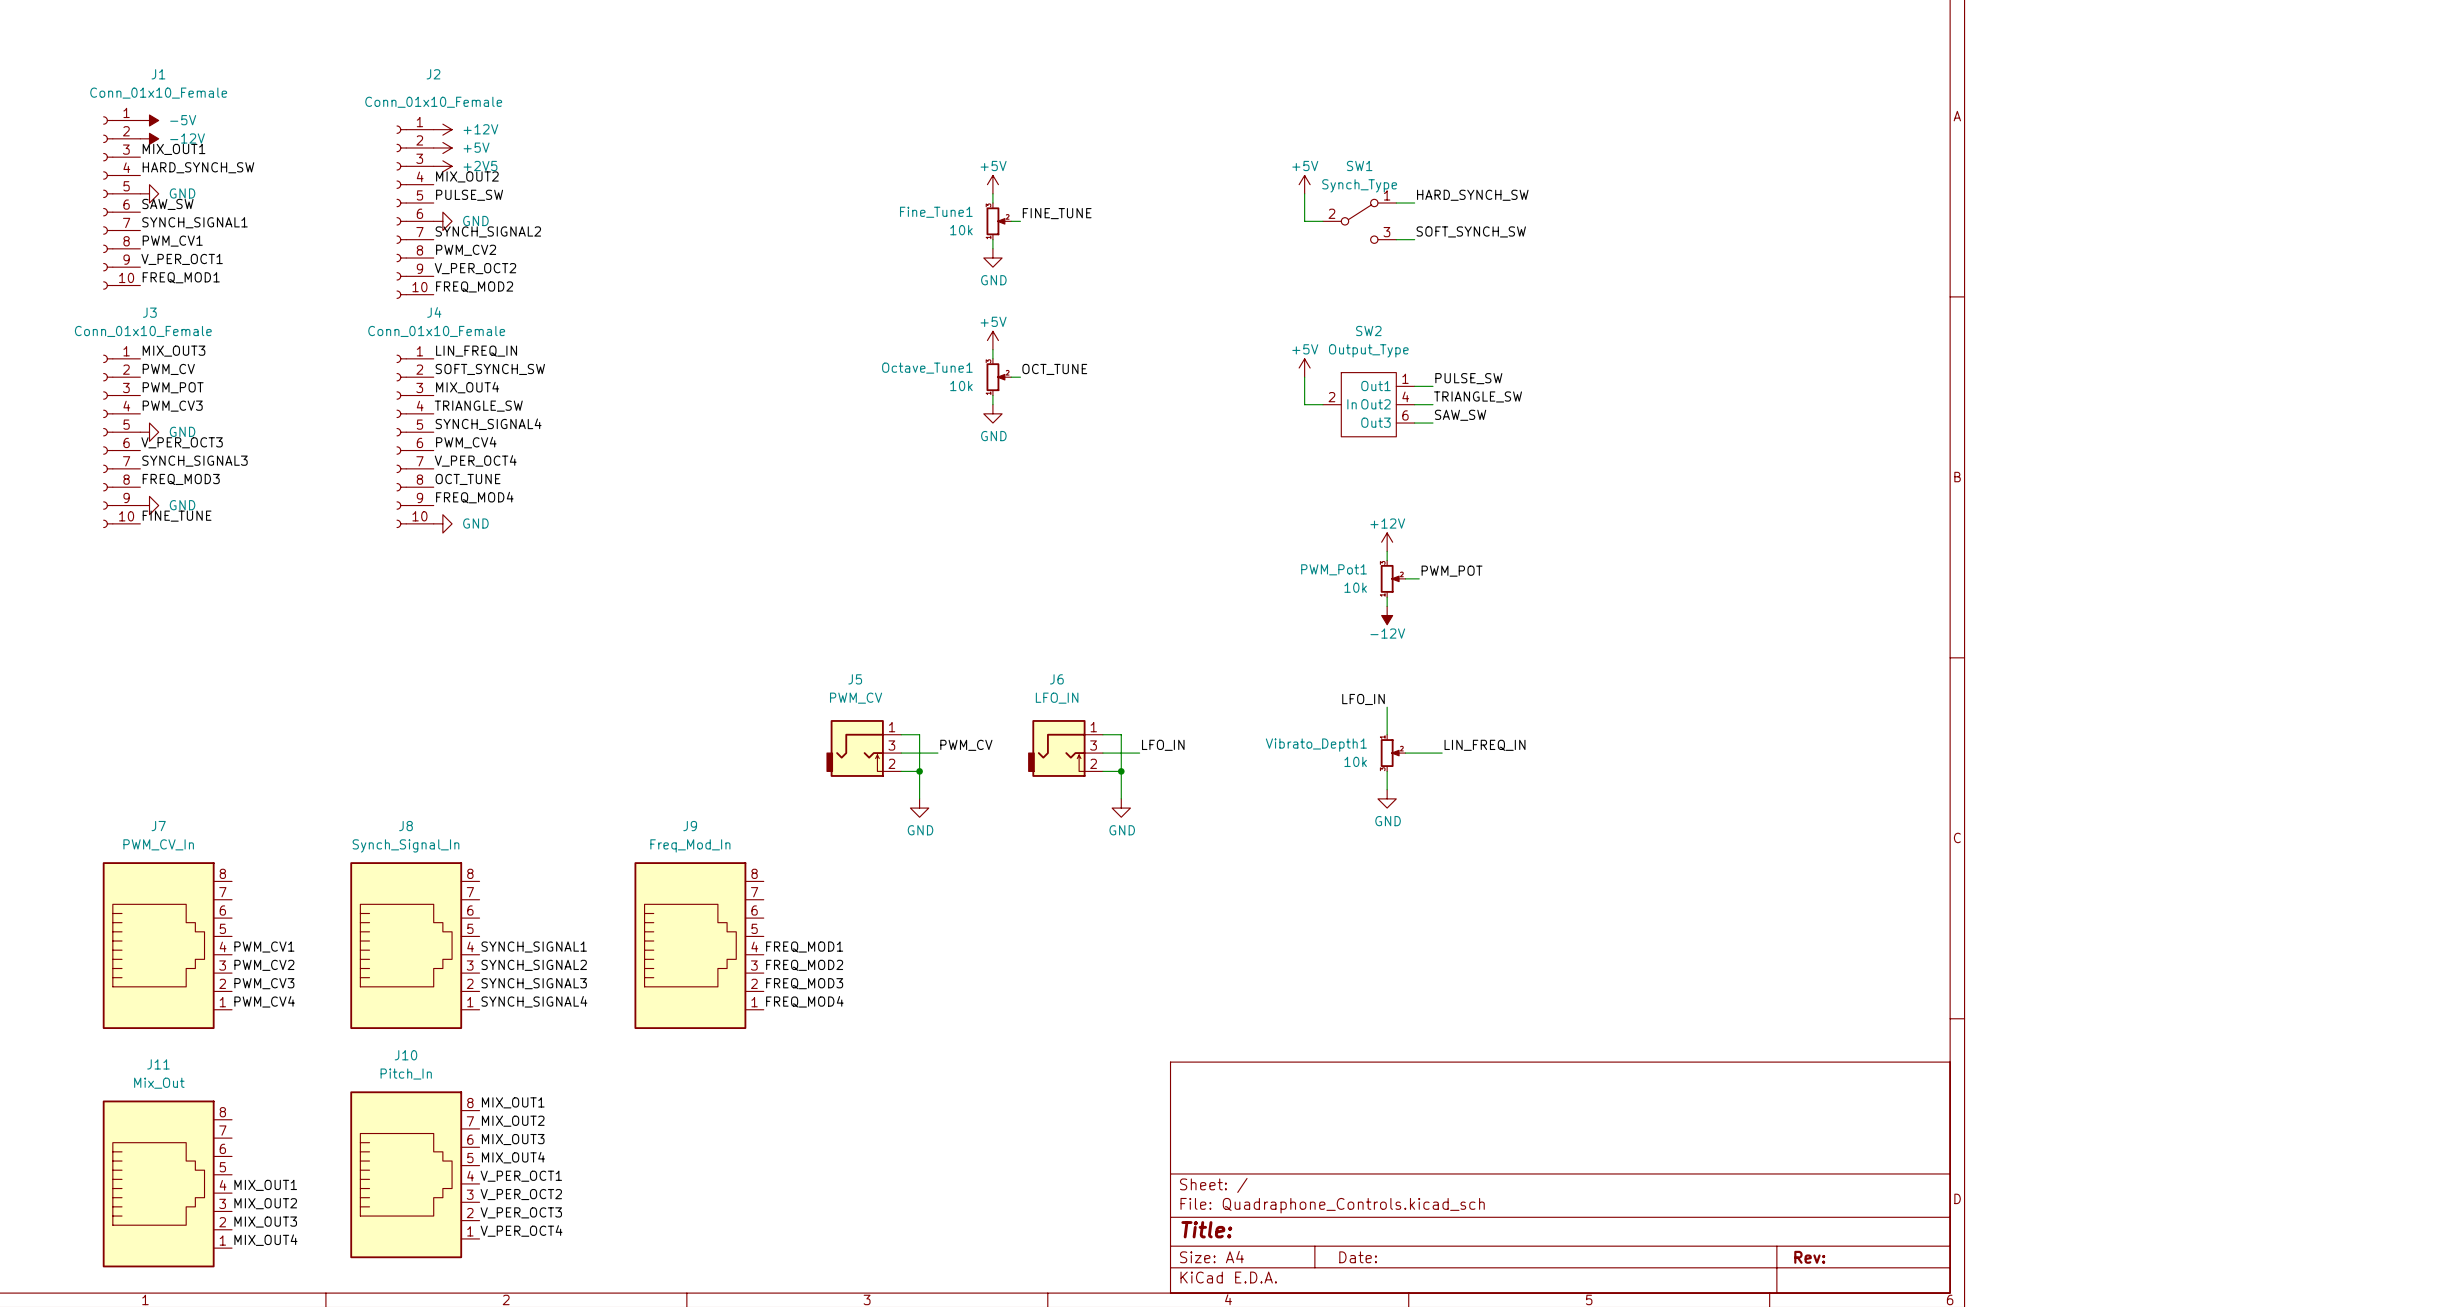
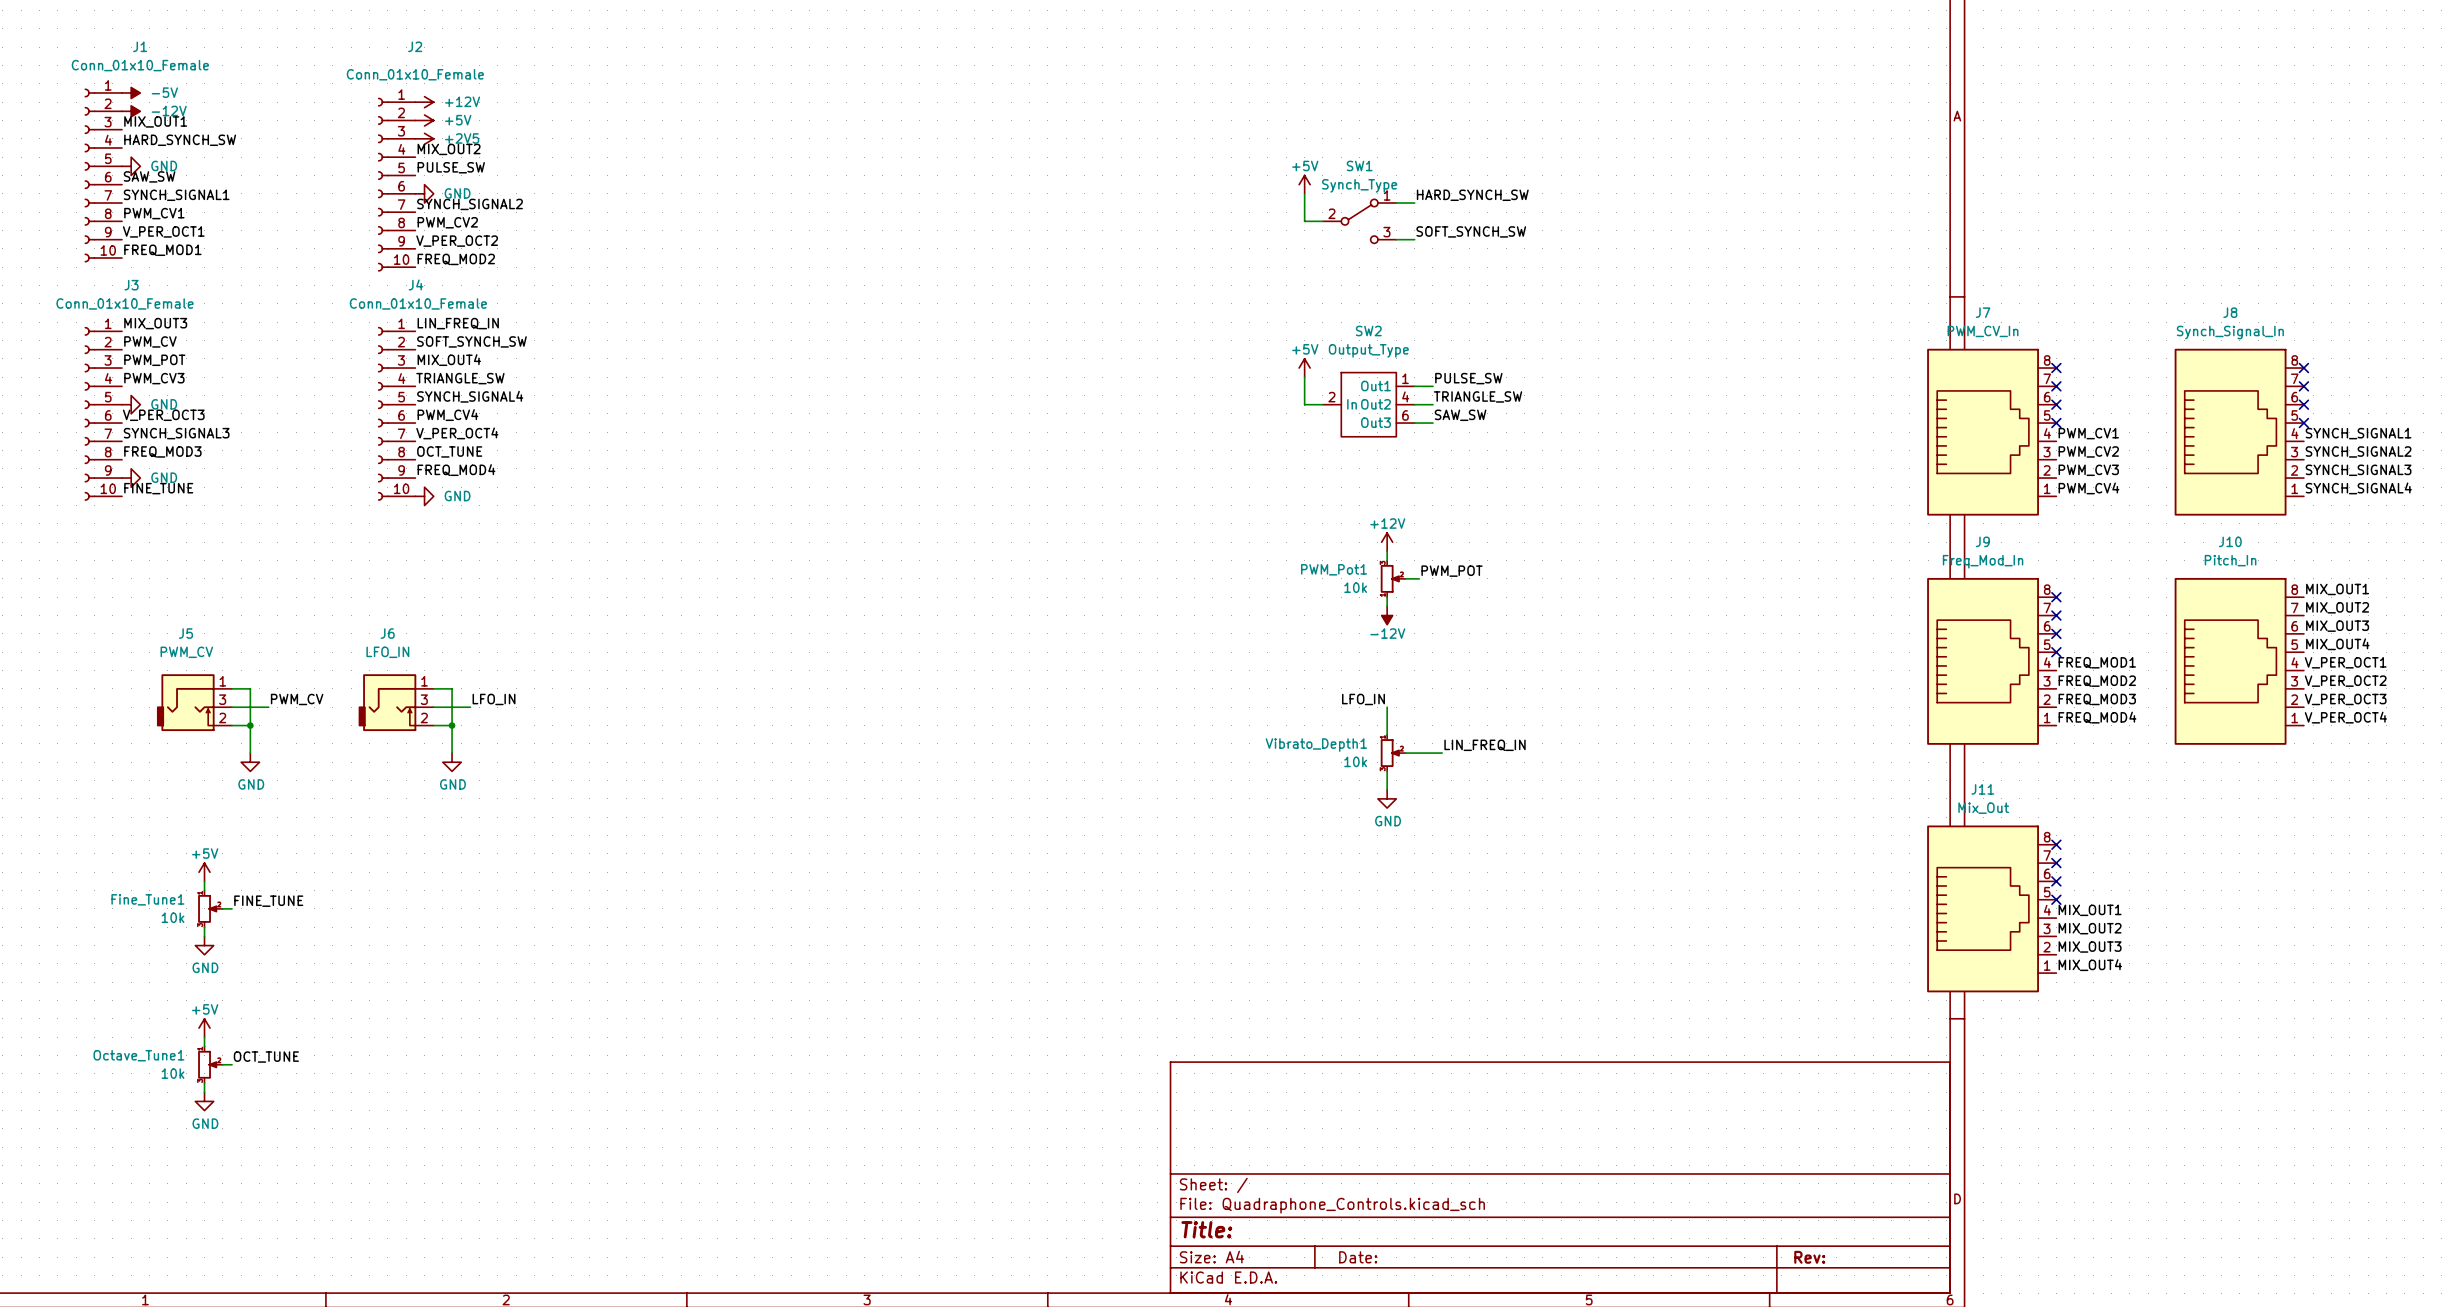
power symbol position: -5V (149, 120) -> -5V (131, 92)
power symbol position: +12V (442, 129) -> +12V (424, 102)
power symbol position: -12V (149, 138) -> -12V (131, 111)
power symbol position: +5V (442, 147) -> +5V (424, 120)
label position: MIX_OUT1 (174, 149) -> MIX_OUT1 (155, 121)
power symbol position: +2V5 (442, 166) -> +2V5 (424, 138)
label position: HARD_SYNCH_SW (198, 167) -> HARD_SYNCH_SW (180, 140)
label position: MIX_OUT2 (467, 176) -> MIX_OUT2 (449, 149)
power symbol: +5V (992, 184) -> none
power symbol position: GND (149, 193) -> GND (131, 166)
wire: (992, 193) (992, 203) -> none
label position: PULSE_SW (469, 195) -> PULSE_SW (451, 167)
J1 position: (121, 203) -> (103, 175)
label position: SAW_SW (167, 204) -> SAW_SW (149, 176)
J2 position: (415, 212) -> (396, 184)
label: FINE_TUNE (1057, 213) -> none
power symbol position: GND (442, 221) -> GND (424, 193)
Fine_Tune1 flip: as is (995, 221) -> up-down (207, 908)
Fine_Tune1 position: (998, 221) -> (210, 908)
wire: (1011, 221) (1020, 221) -> none
label position: SYNCH_SIGNAL1 (194, 222) -> SYNCH_SIGNAL1 (176, 195)
label position: SYNCH_SIGNAL2 (488, 231) -> SYNCH_SIGNAL2 (470, 204)
wire: (992, 239) (992, 248) -> none
label position: PWM_CV1 (172, 241) -> PWM_CV1 (154, 213)
label position: PWM_CV2 (466, 250) -> PWM_CV2 (447, 222)
power symbol: GND (992, 258) -> none
label position: V_PER_OCT1 (182, 259) -> V_PER_OCT1 (163, 231)
label position: V_PER_OCT2 (475, 268) -> V_PER_OCT2 (457, 241)
label position: FREQ_MOD1 (181, 277) -> FREQ_MOD1 (162, 250)
label position: FREQ_MOD2 (474, 286) -> FREQ_MOD2 (456, 259)
power symbol: +5V (992, 340) -> none
wire: (992, 349) (992, 358) -> none
label position: MIX_OUT3 (174, 351) -> MIX_OUT3 (155, 323)
label position: LIN_FREQ_IN (476, 351) -> LIN_FREQ_IN (458, 323)
no-connect mark: none -> (2056, 368)
no-connect mark: none -> (2303, 368)
label position: PWM_CV (168, 369) -> PWM_CV (150, 341)
label position: SOFT_SYNCH_SW (490, 369) -> SOFT_SYNCH_SW (471, 341)
label: OCT_TUNE (1054, 369) -> none
Octave_Tune1 flip: as is (995, 377) -> up-down (207, 1064)
Octave_Tune1 position: (998, 377) -> (210, 1064)
wire: (1011, 377) (1020, 377) -> none
no-connect mark: none -> (2056, 386)
no-connect mark: none -> (2303, 386)
label position: PWM_POT (173, 387) -> PWM_POT (154, 360)
label position: MIX_OUT4 (467, 387) -> MIX_OUT4 (449, 360)
wire: (992, 395) (992, 404) -> none
power symbol: none -> GND (131, 404)
no-connect mark: none -> (2056, 404)
no-connect mark: none -> (2303, 404)
label position: PWM_CV3 (172, 406) -> PWM_CV3 (154, 378)
label position: TRIANGLE_SW (478, 406) -> TRIANGLE_SW (460, 378)
power symbol: GND (992, 413) -> none
no-connect mark: none -> (2056, 423)
no-connect mark: none -> (2303, 423)
label position: SYNCH_SIGNAL4 (488, 424) -> SYNCH_SIGNAL4 (470, 396)
power symbol: GND (149, 432) -> none
label: none -> PWM_CV1 (2088, 433)
label: none -> SYNCH_SIGNAL1 (2358, 433)
J3 position: (121, 441) -> (103, 413)
J4 position: (415, 441) -> (396, 413)
label position: V_PER_OCT3 (182, 442) -> V_PER_OCT3 (163, 415)
label position: PWM_CV4 (466, 442) -> PWM_CV4 (447, 415)
label: none -> PWM_CV2 (2088, 451)
label: none -> SYNCH_SIGNAL2 (2358, 451)
label position: V_PER_OCT4 (475, 460) -> V_PER_OCT4 (457, 433)
label position: SYNCH_SIGNAL3 (194, 461) -> SYNCH_SIGNAL3 (176, 433)
label: none -> PWM_CV3 (2088, 470)
label: none -> SYNCH_SIGNAL3 (2358, 470)
power symbol: none -> GND (131, 478)
label position: FREQ_MOD3 (181, 479) -> FREQ_MOD3 (162, 451)
label position: OCT_TUNE (468, 479) -> OCT_TUNE (449, 451)
label: none -> PWM_CV4 (2088, 488)
label: none -> SYNCH_SIGNAL4 (2358, 488)
label position: FREQ_MOD4 (474, 497) -> FREQ_MOD4 (456, 470)
power symbol: GND (149, 505) -> none
label position: FINE_TUNE (177, 516) -> FINE_TUNE (158, 488)
power symbol position: GND (442, 523) -> GND (424, 496)
label: none -> MIX_OUT1 (2337, 589)
no-connect mark: none -> (2056, 597)
label: none -> MIX_OUT2 (2337, 607)
no-connect mark: none -> (2056, 615)
label: none -> MIX_OUT3 (2337, 626)
no-connect mark: none -> (2056, 633)
label: none -> MIX_OUT4 (2337, 644)
no-connect mark: none -> (2056, 652)
label: none -> FREQ_MOD1 (2097, 662)
label: none -> V_PER_OCT1 (2345, 662)
label: none -> FREQ_MOD2 (2097, 681)
label: none -> V_PER_OCT2 (2345, 681)
wire: none -> (232, 688) (250, 688) (250, 753)
wire: none -> (433, 688) (452, 688) (452, 753)
label: none -> PWM_CV (297, 699)
label: none -> LFO_IN (494, 699)
label: none -> FREQ_MOD3 (2097, 699)
label: none -> V_PER_OCT3 (2345, 699)
wire: none -> (232, 707) (268, 707)
wire: none -> (433, 707) (470, 707)
label: none -> FREQ_MOD4 (2097, 717)
label: none -> V_PER_OCT4 (2345, 717)
wire: none -> (232, 725) (250, 725)
junction: none -> (250, 725)
wire: none -> (433, 725) (452, 725)
junction: none -> (452, 725)
wire: (901, 734) (919, 734) (919, 798) -> none
wire: (1102, 734) (1121, 734) (1121, 798) -> none
label: PWM_CV (966, 745) -> none
label: LFO_IN (1163, 745) -> none
J5 position: (864, 748) -> (194, 702)
J6 position: (1065, 748) -> (396, 702)
wire: (901, 753) (937, 753) -> none
wire: (1102, 753) (1139, 753) -> none
power symbol: none -> GND (250, 762)
power symbol: none -> GND (452, 762)
wire: (901, 771) (919, 771) -> none
junction: (919, 771) -> none
wire: (1102, 771) (1121, 771) -> none
junction: (1121, 771) -> none
power symbol: GND (919, 808) -> none
power symbol: GND (1121, 808) -> none
no-connect mark: none -> (2056, 844)
no-connect mark: none -> (2056, 863)
power symbol: none -> +5V (204, 872)
no-connect mark: none -> (2056, 881)
no-connect mark: none -> (2056, 899)
label: none -> FINE_TUNE (268, 901)
wire: none -> (222, 908) (232, 908)
label: none -> MIX_OUT1 (2090, 910)
label: none -> MIX_OUT2 (2090, 928)
J7 position: (167, 945) -> (1991, 432)
power symbol: none -> GND (204, 945)
J8 position: (414, 945) -> (2239, 432)
J9 position: (699, 945) -> (1991, 661)
label: PWM_CV1 (264, 947) -> none
label: SYNCH_SIGNAL1 (534, 947) -> none
label: FREQ_MOD1 (804, 947) -> none
label: none -> MIX_OUT3 (2090, 947)
label: PWM_CV2 (264, 965) -> none
label: SYNCH_SIGNAL2 (534, 965) -> none
label: FREQ_MOD2 (804, 965) -> none
label: none -> MIX_OUT4 (2090, 965)
label: PWM_CV3 (264, 983) -> none
label: SYNCH_SIGNAL3 (534, 983) -> none
label: FREQ_MOD3 (804, 983) -> none
label: PWM_CV4 (264, 1001) -> none
label: SYNCH_SIGNAL4 (534, 1001) -> none
label: FREQ_MOD4 (804, 1001) -> none
power symbol: none -> +5V (204, 1028)
wire: none -> (204, 1037) (204, 1046)
label: none -> OCT_TUNE (266, 1057)
wire: none -> (222, 1064) (232, 1064)
wire: none -> (204, 1083) (204, 1092)
power symbol: none -> GND (204, 1101)
label: MIX_OUT1 (513, 1102) -> none
label: MIX_OUT2 (513, 1121) -> none
label: MIX_OUT3 (513, 1139) -> none
label: MIX_OUT4 (513, 1157) -> none
J10 position: (414, 1174) -> (2239, 661)
label: V_PER_OCT1 (521, 1176) -> none
J11 position: (167, 1183) -> (1991, 908)
label: MIX_OUT1 (265, 1185) -> none
label: V_PER_OCT2 (521, 1194) -> none
label: MIX_OUT2 (265, 1203) -> none
label: V_PER_OCT3 (521, 1212) -> none
label: MIX_OUT3 (265, 1222) -> none
label: V_PER_OCT4 (521, 1230) -> none
label: MIX_OUT4 (265, 1240) -> none

